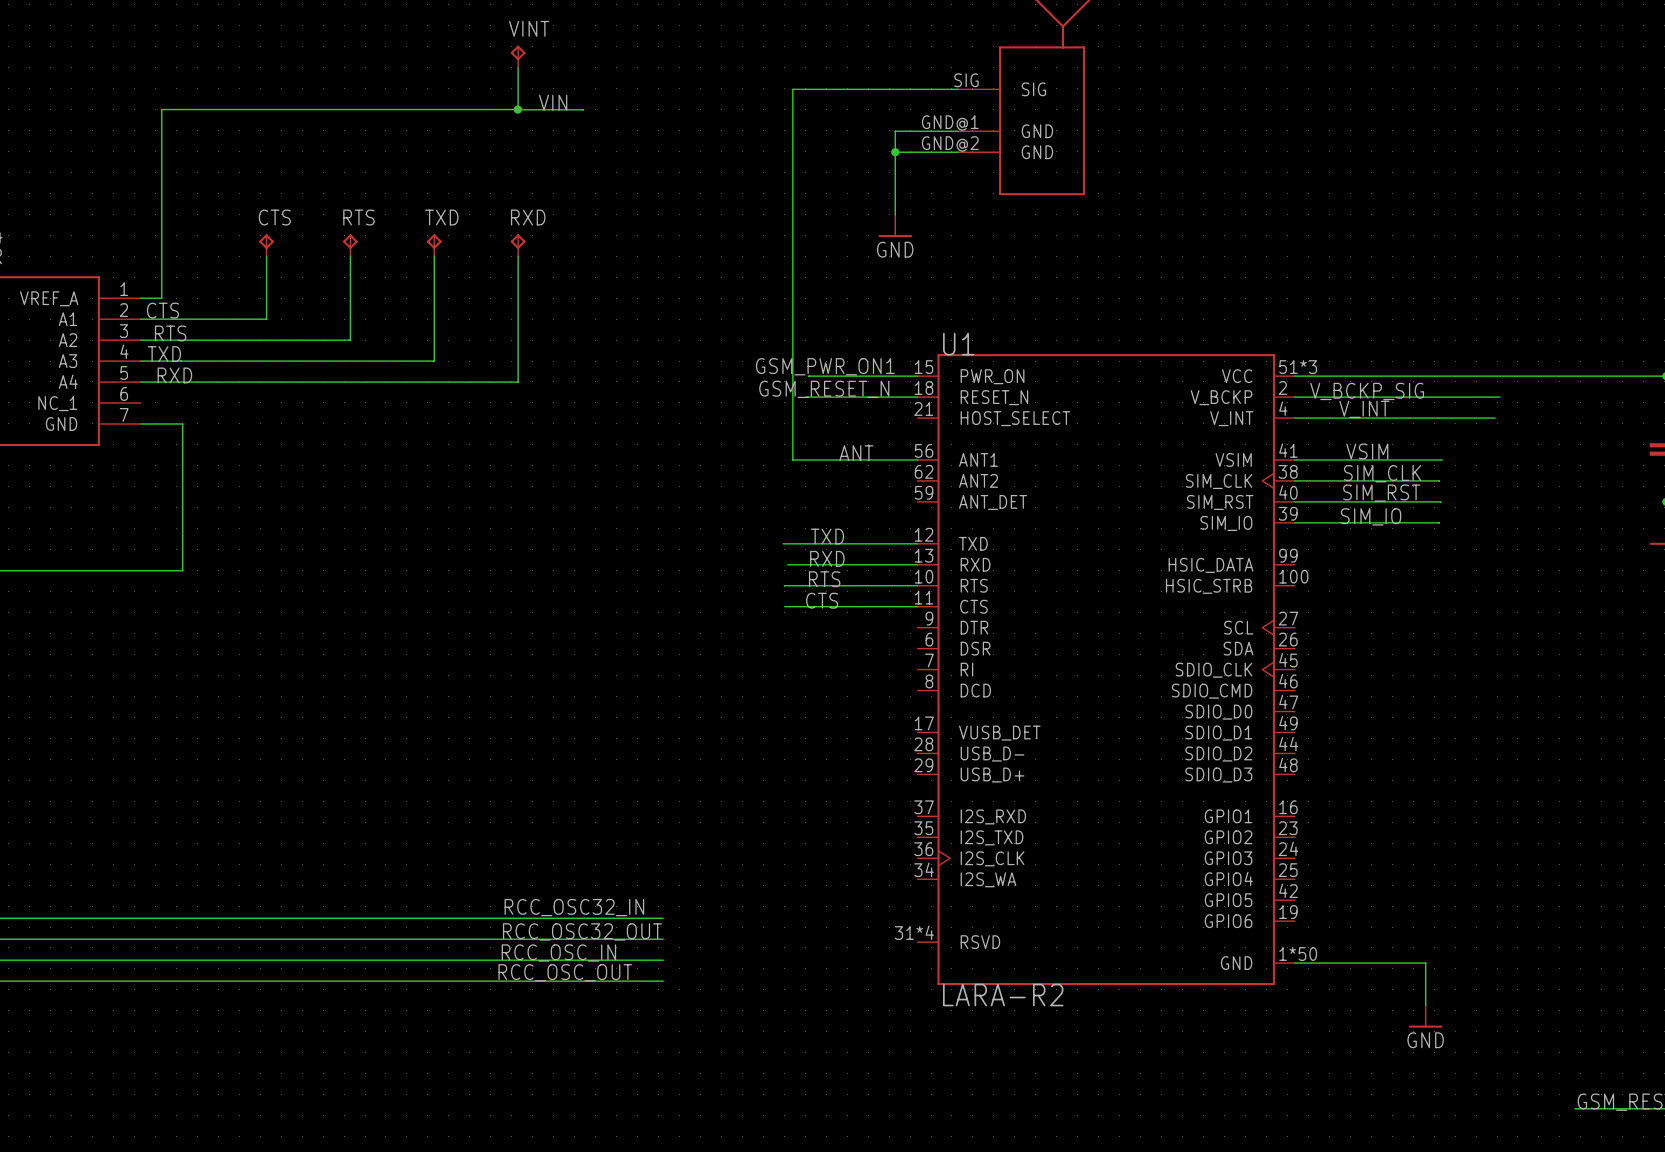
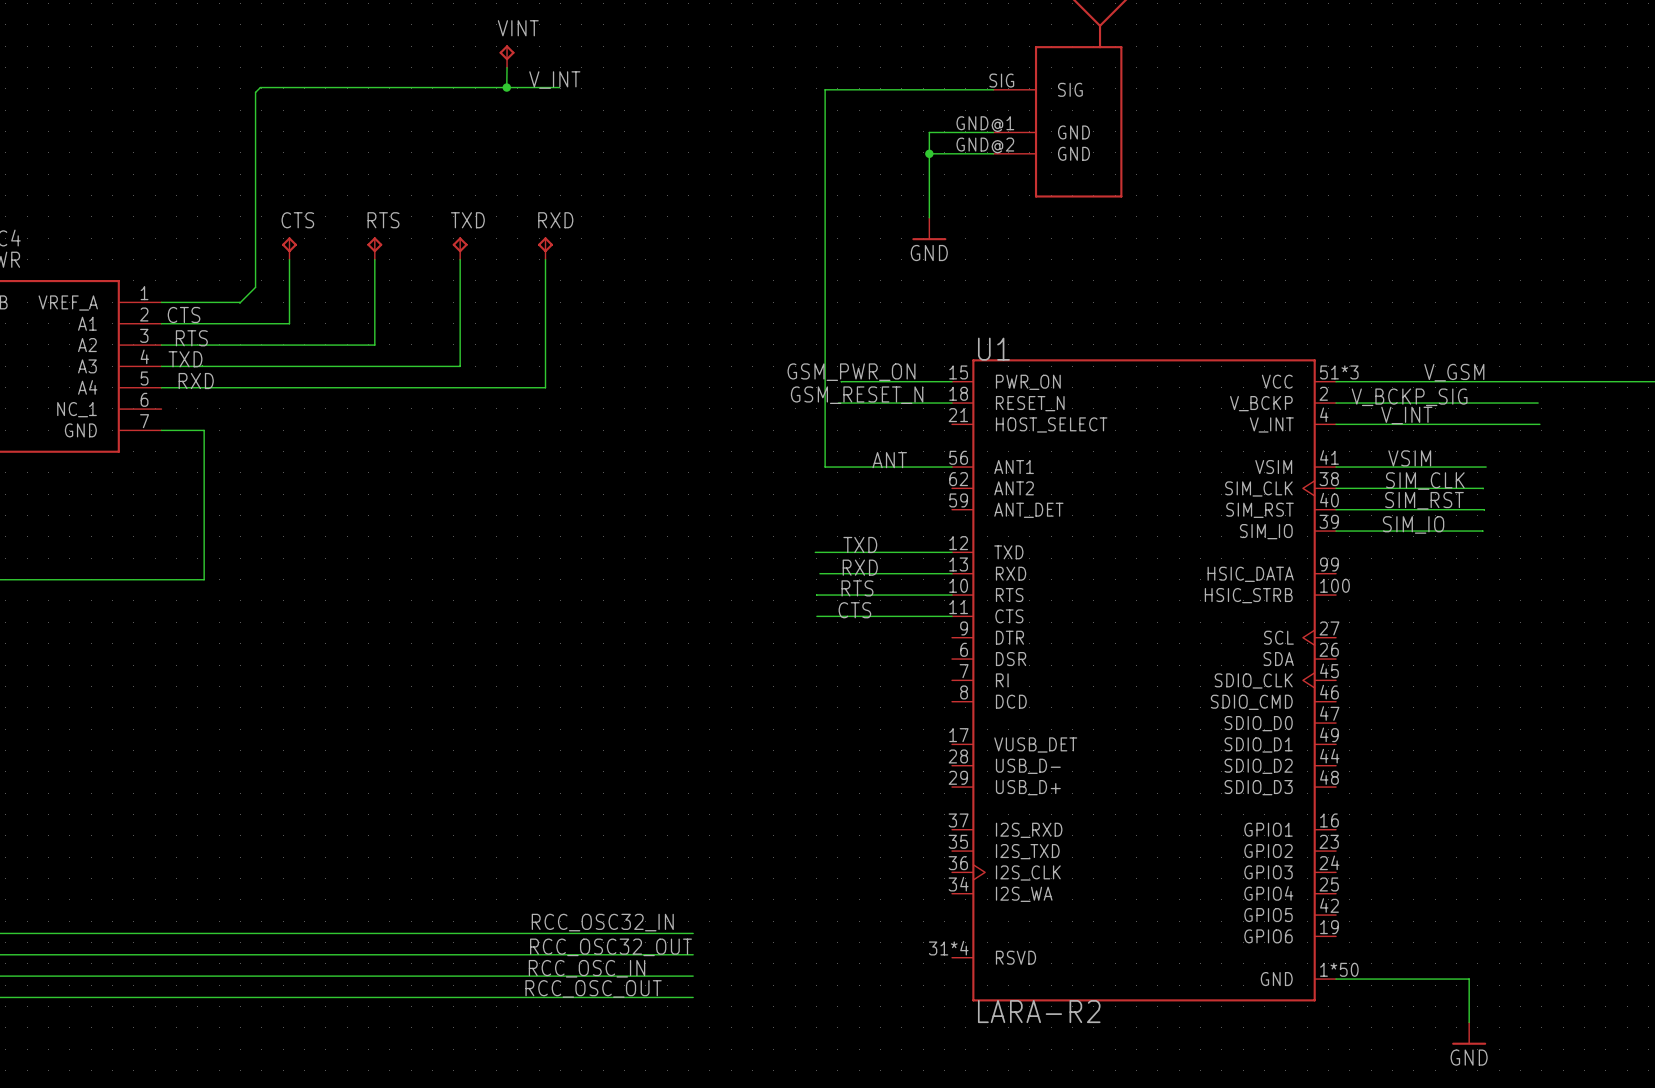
VINT position: (518, 56) -> (507, 56)
wire: none -> (507, 67) (506, 87)
wire: (518, 67) (518, 109) (161, 109) (161, 298) -> (559, 87) (260, 87) (255, 92) (255, 287) (240, 302) (182, 302)
label: VIN (553, 102) -> V_INT (554, 80)
wire: (517, 109) (583, 110) -> none
junction position: (517, 109) -> (506, 87)
label: GSM_PWR_ON1 (825, 366) -> GSM_PWR_ON (851, 372)
label: none -> V_GSM (1454, 372)
wire: (1493, 397) (1500, 397) -> none

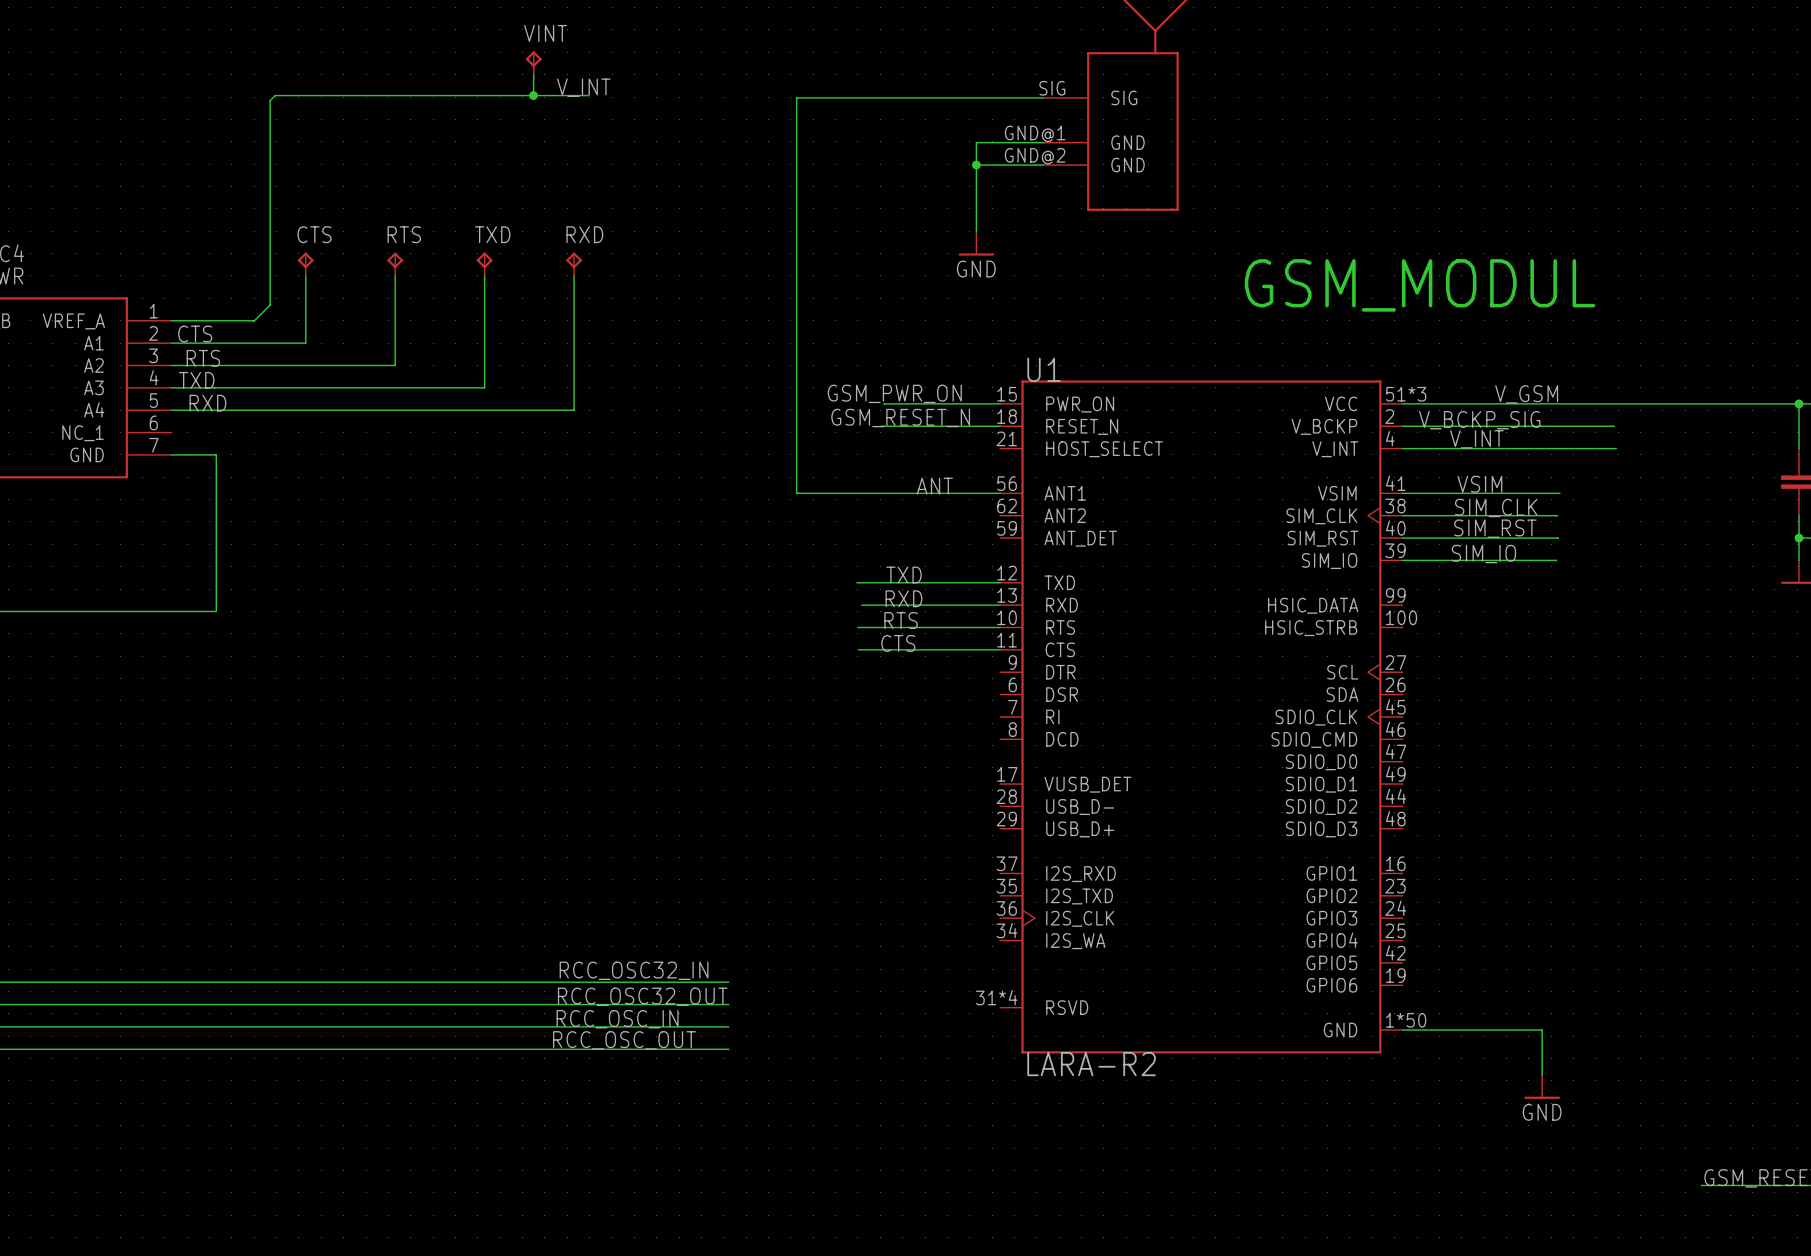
wire: (825, 89) (825, 467) -> (867, 97) (796, 97) (796, 493) (867, 493)
text: none -> GSM_MODUL (1420, 285)

